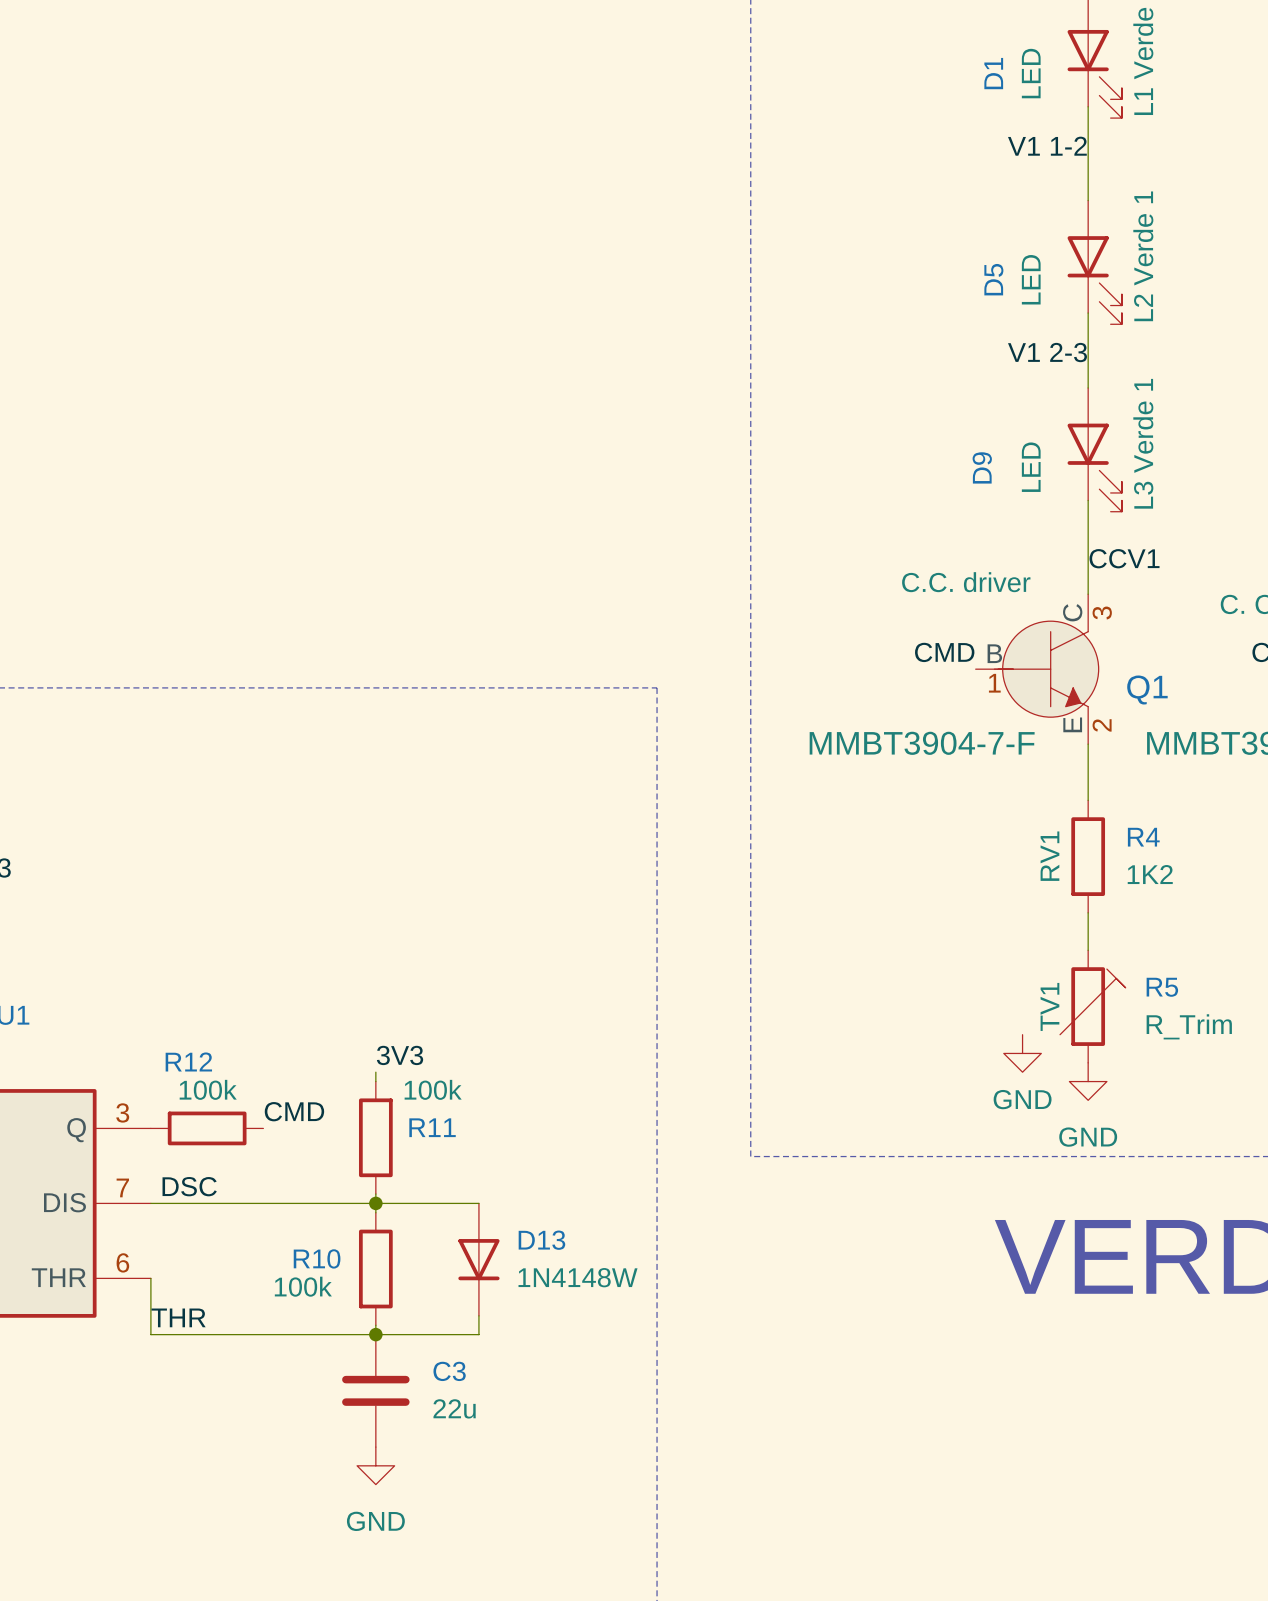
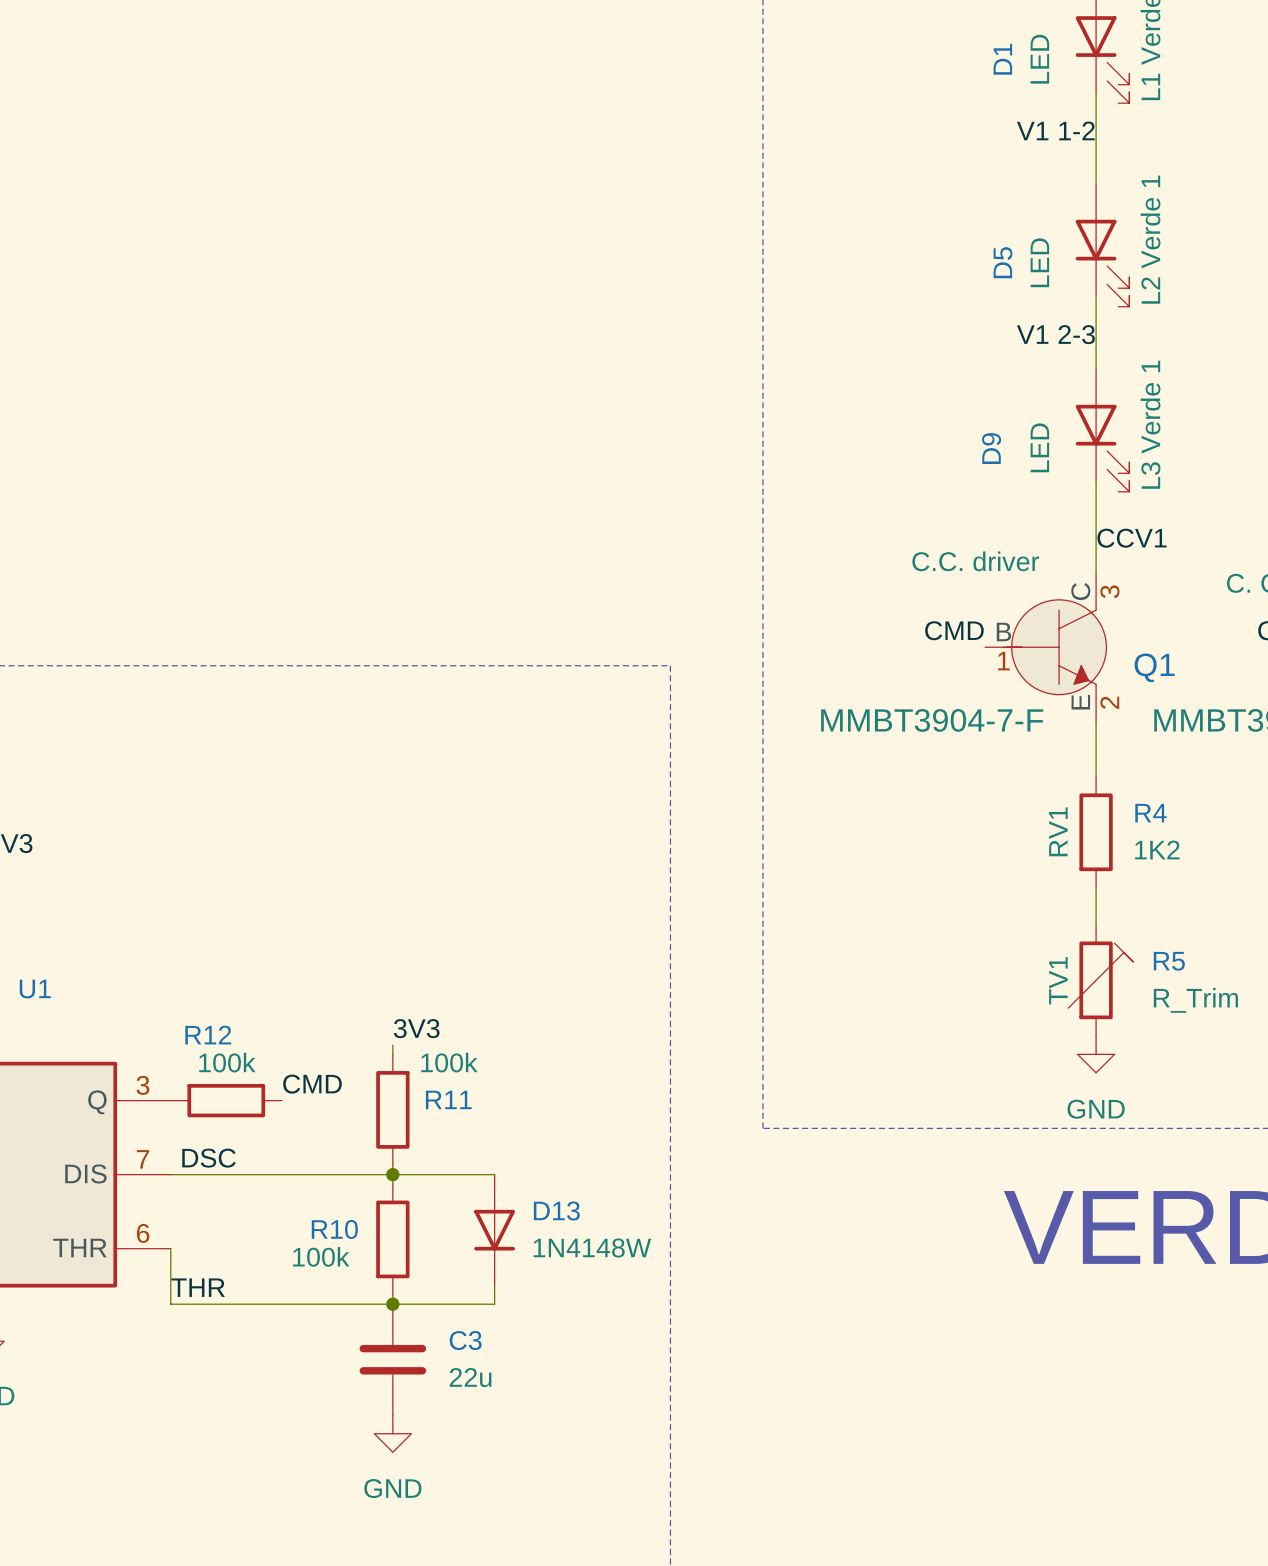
power symbol: GND (1022, 1053) -> none

